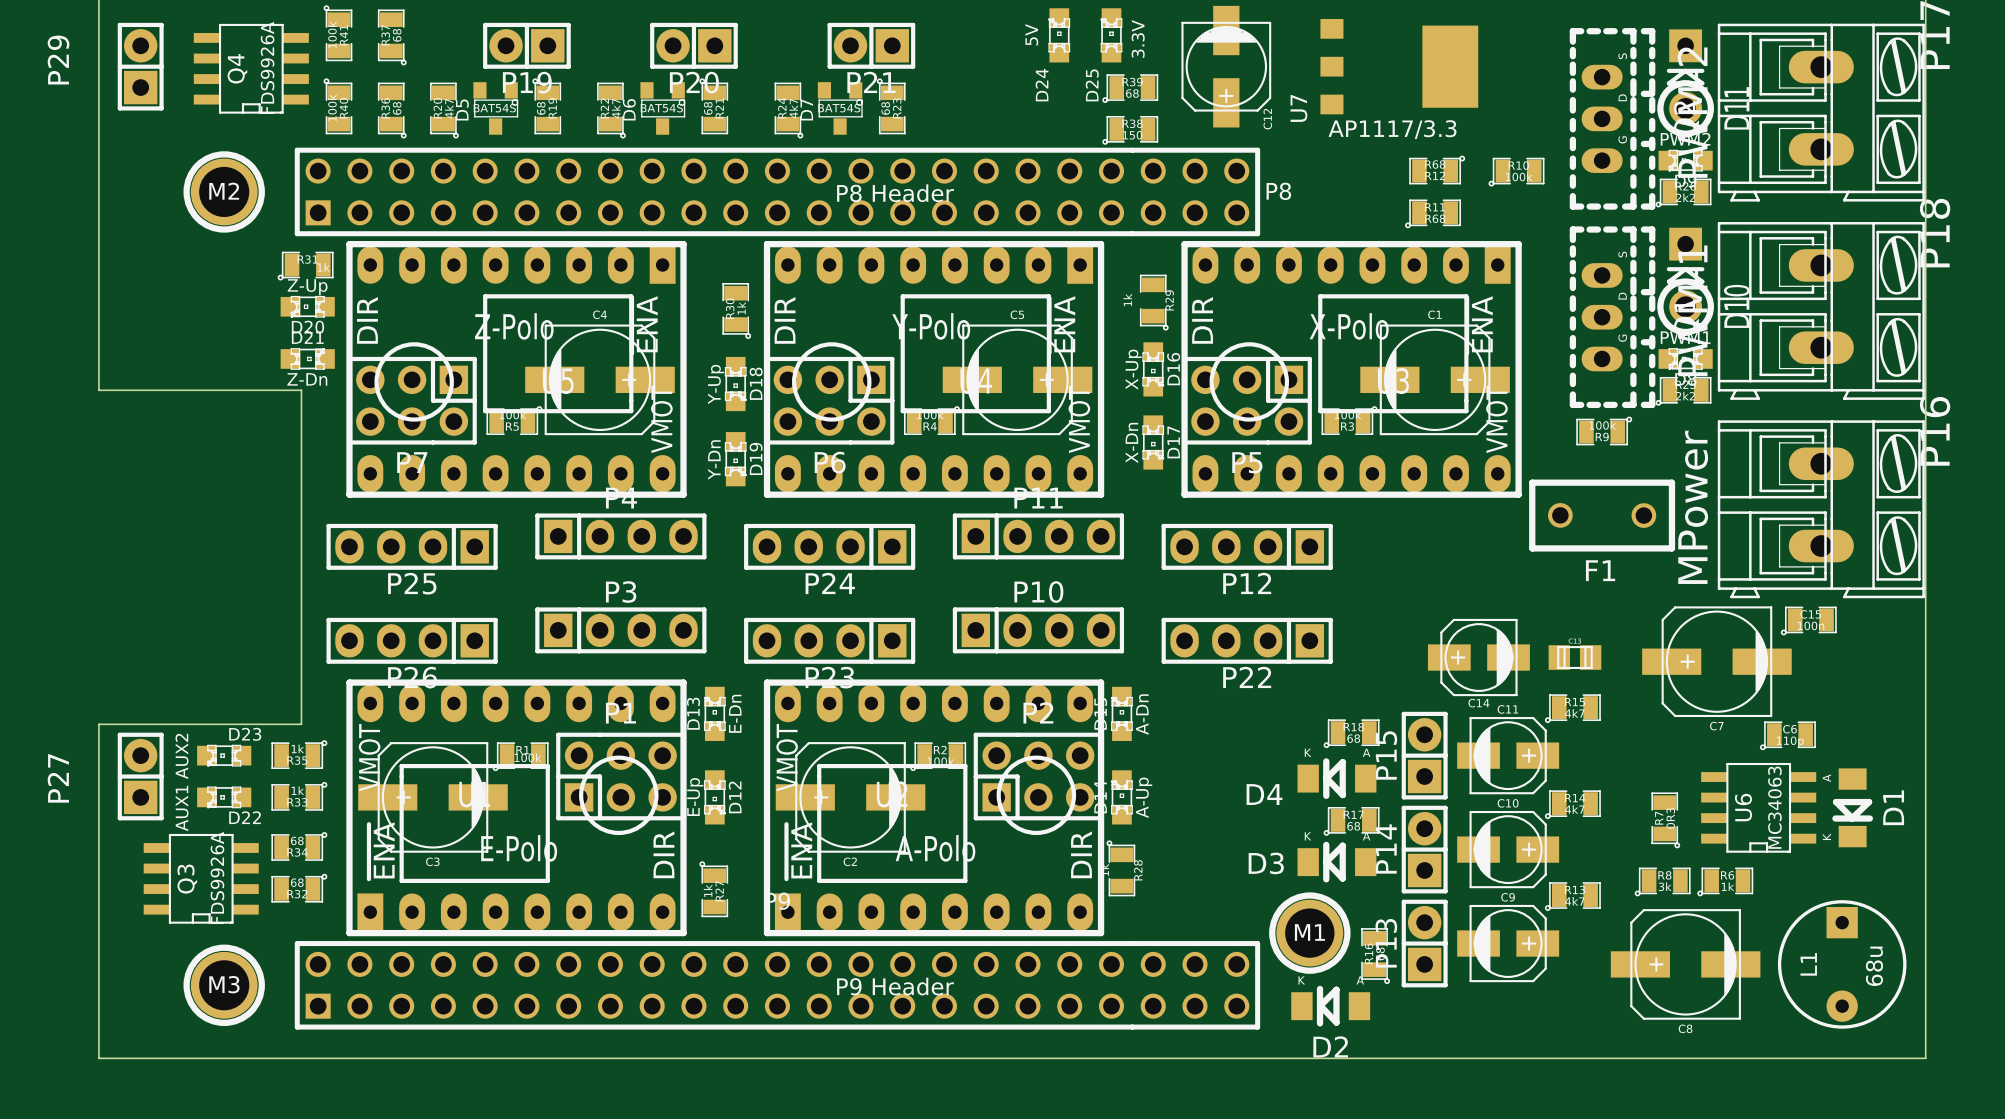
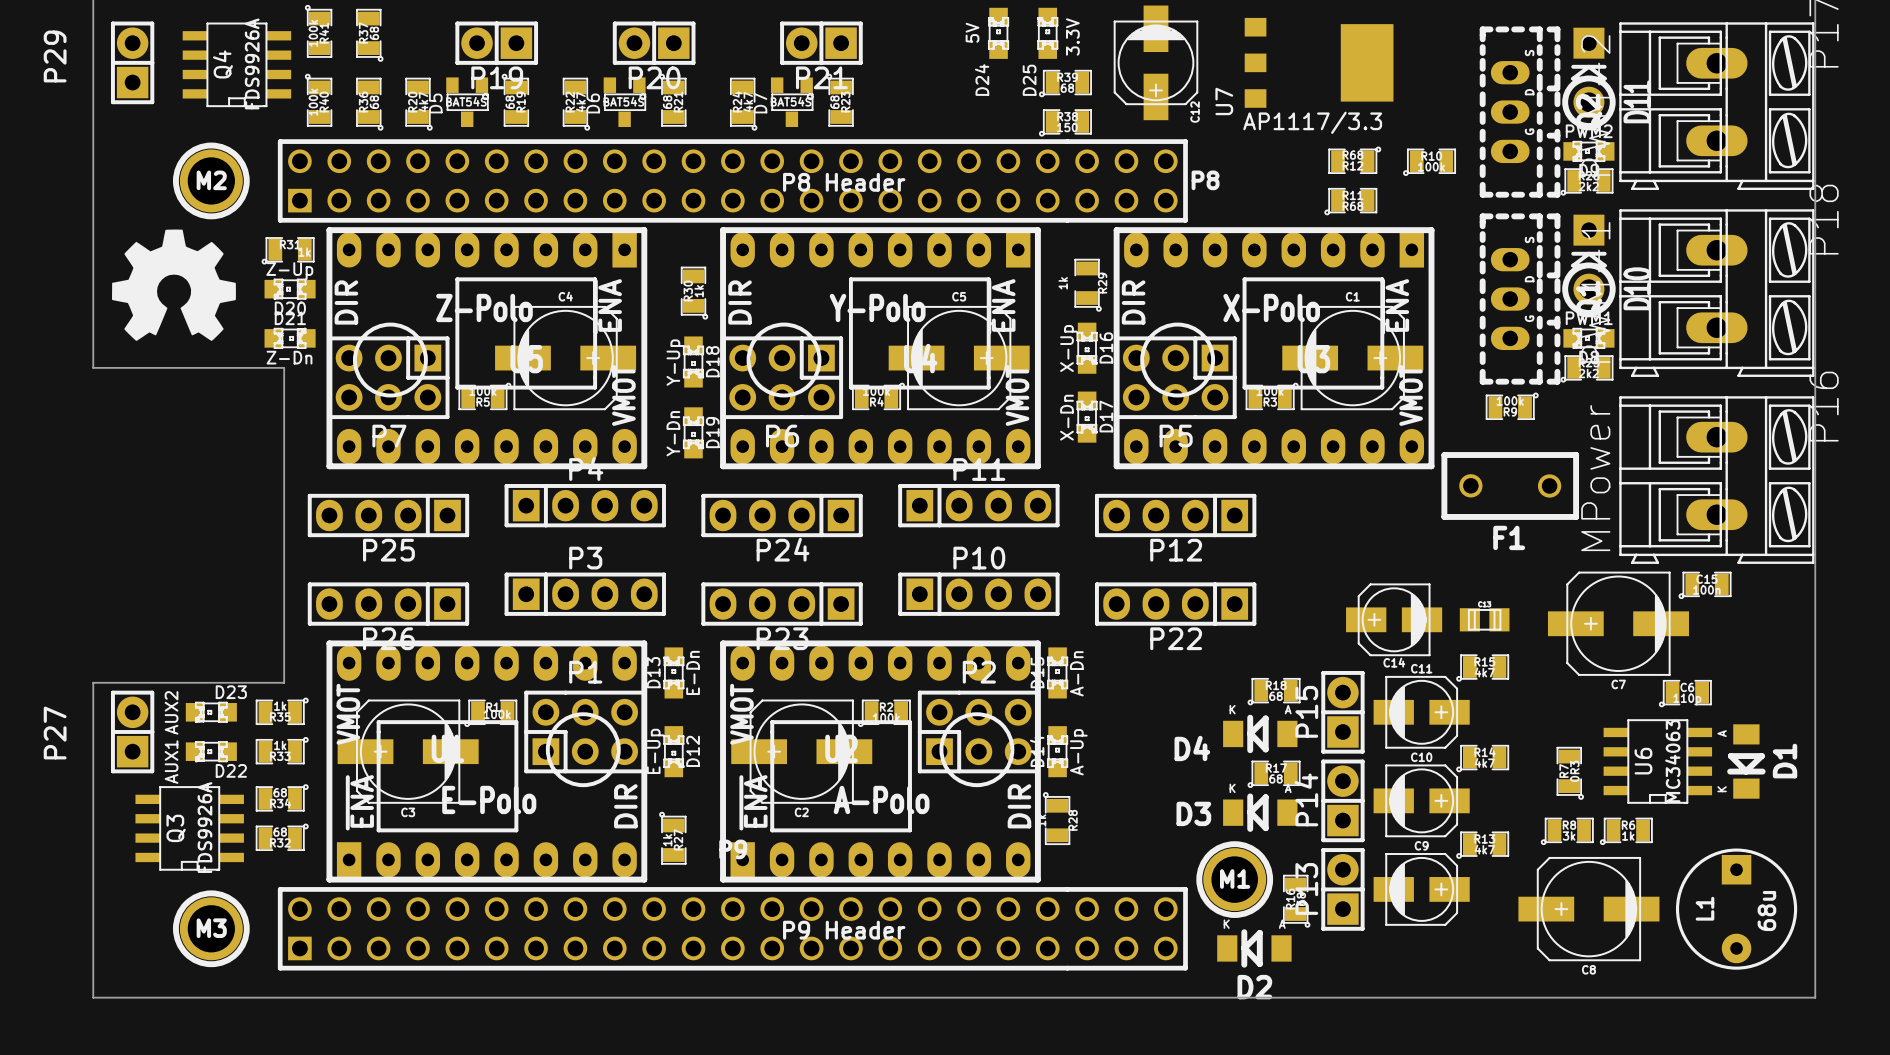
drawing: none -> [111, 229, 236, 341]

